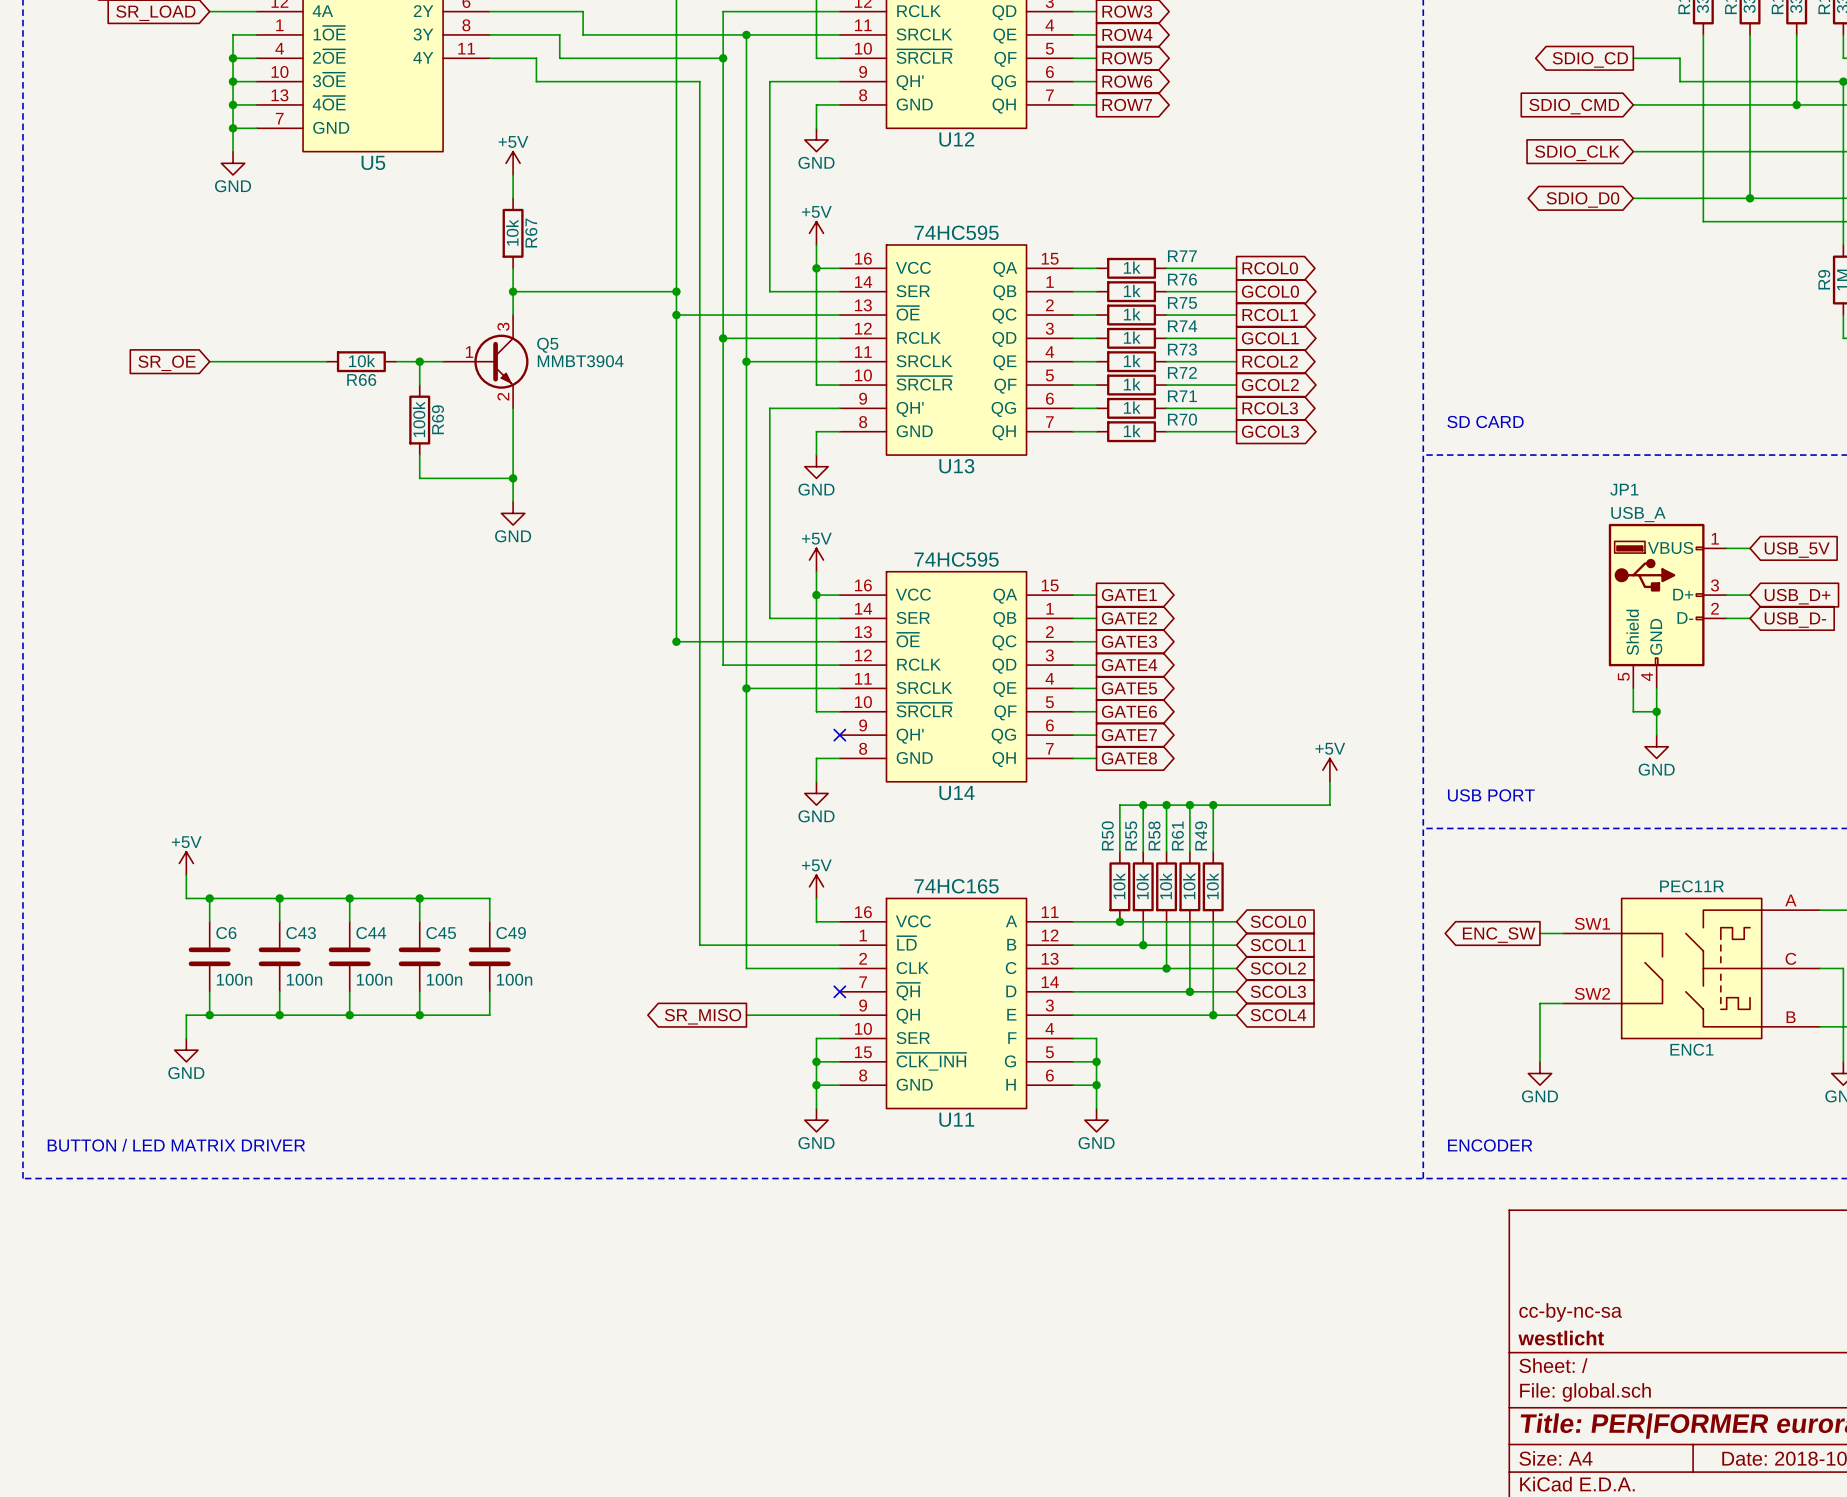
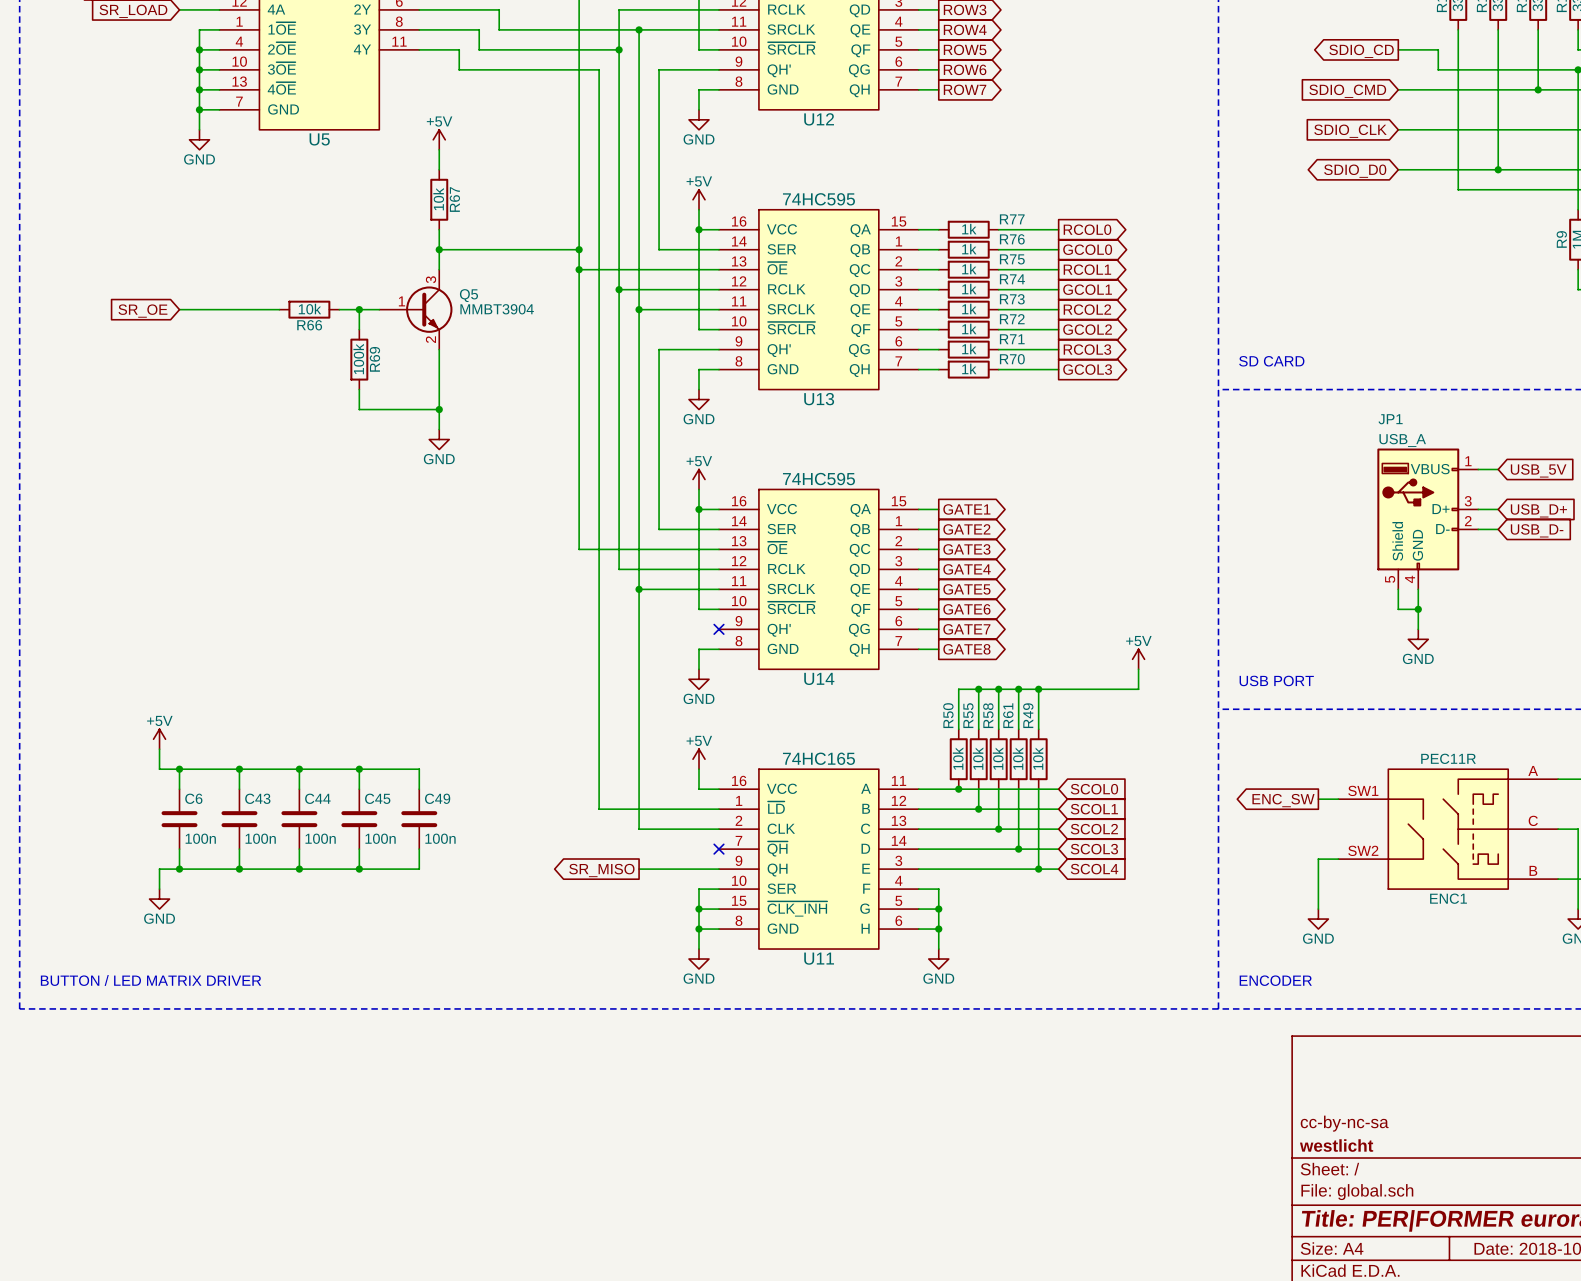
junction: (676, 641) -> none

